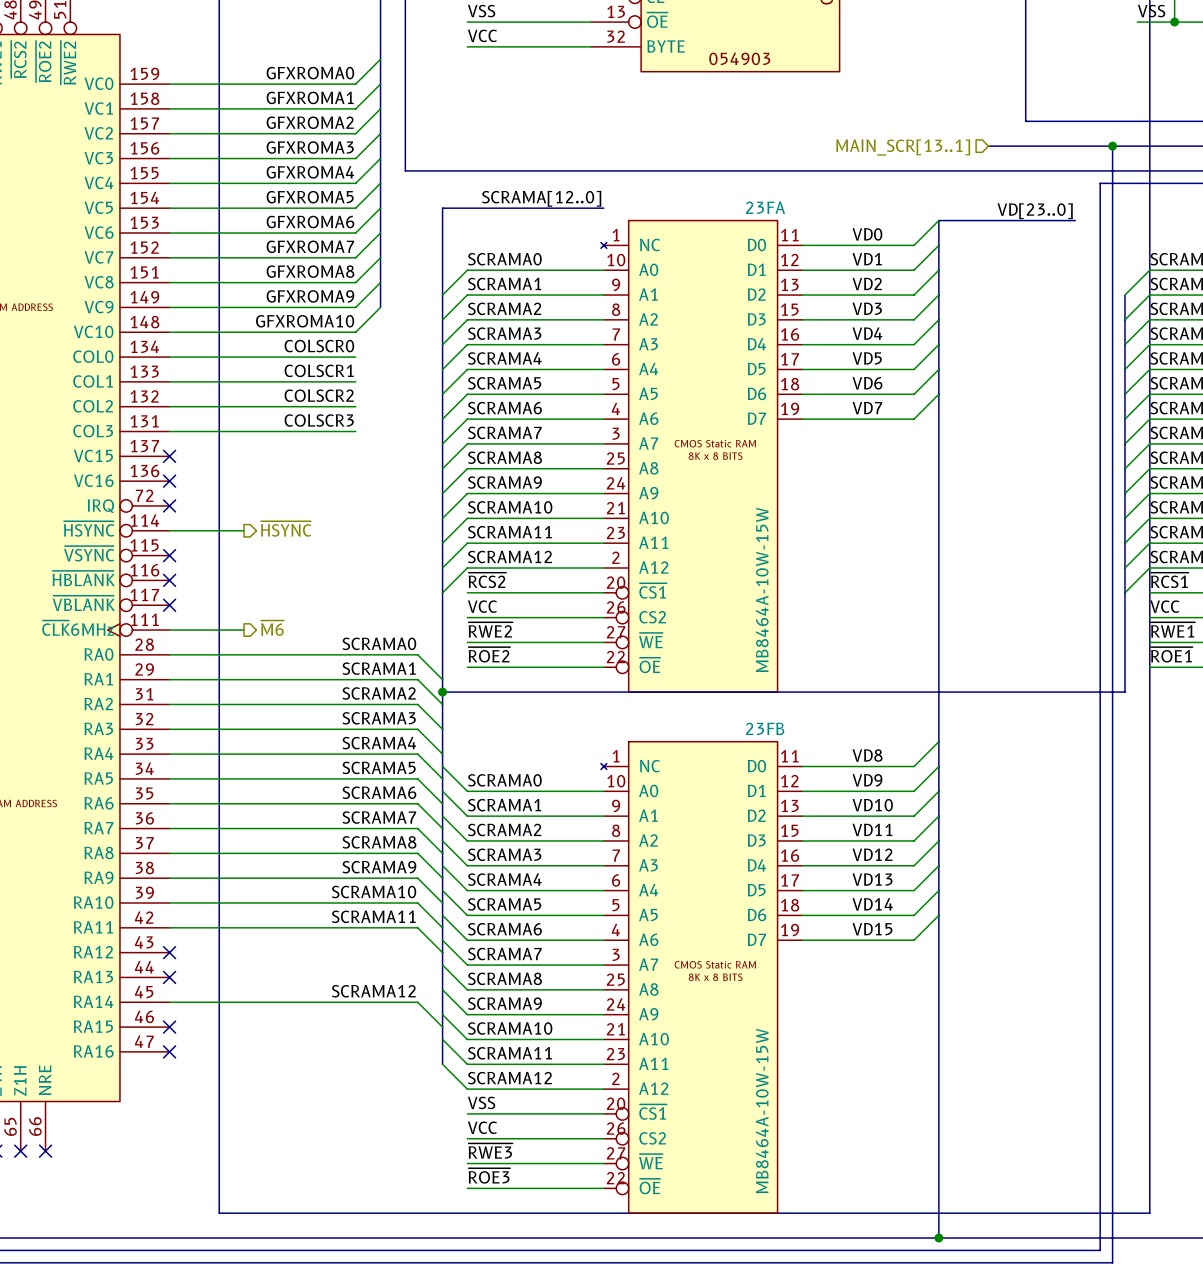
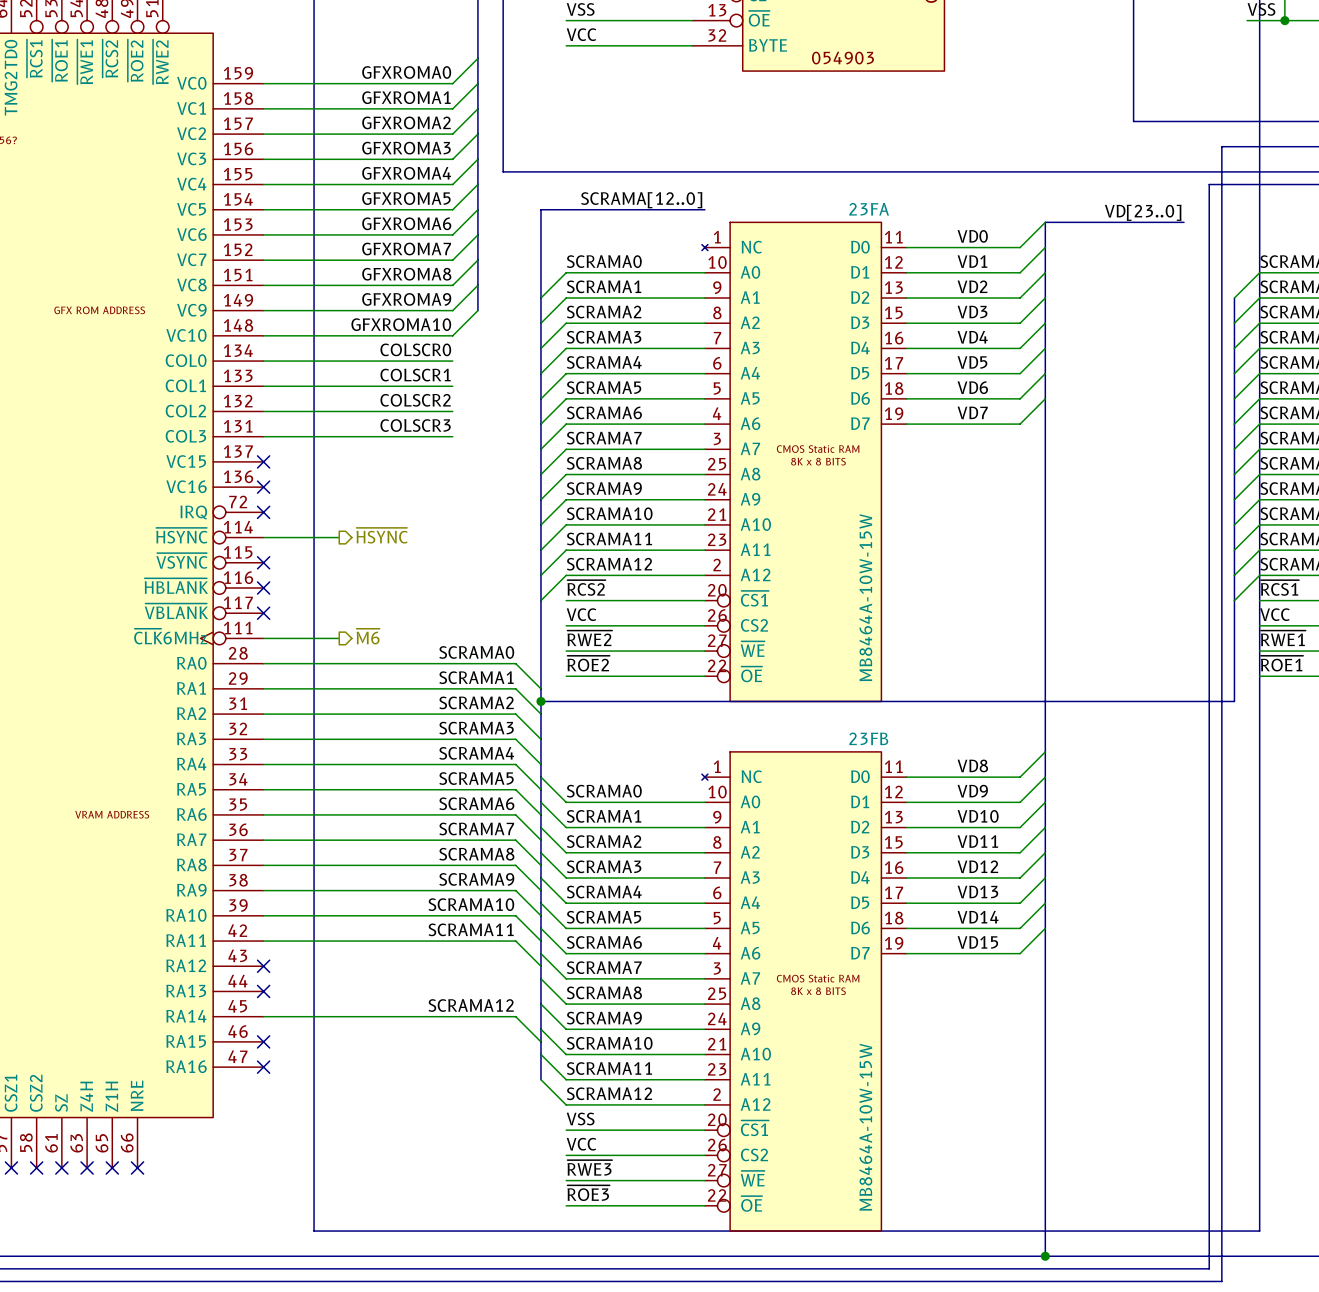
bus: (988, 146) (1112, 146) -> none
junction: (1112, 146) -> none
hierarchical label: MAIN_SCR[13..1] (903, 147) -> none

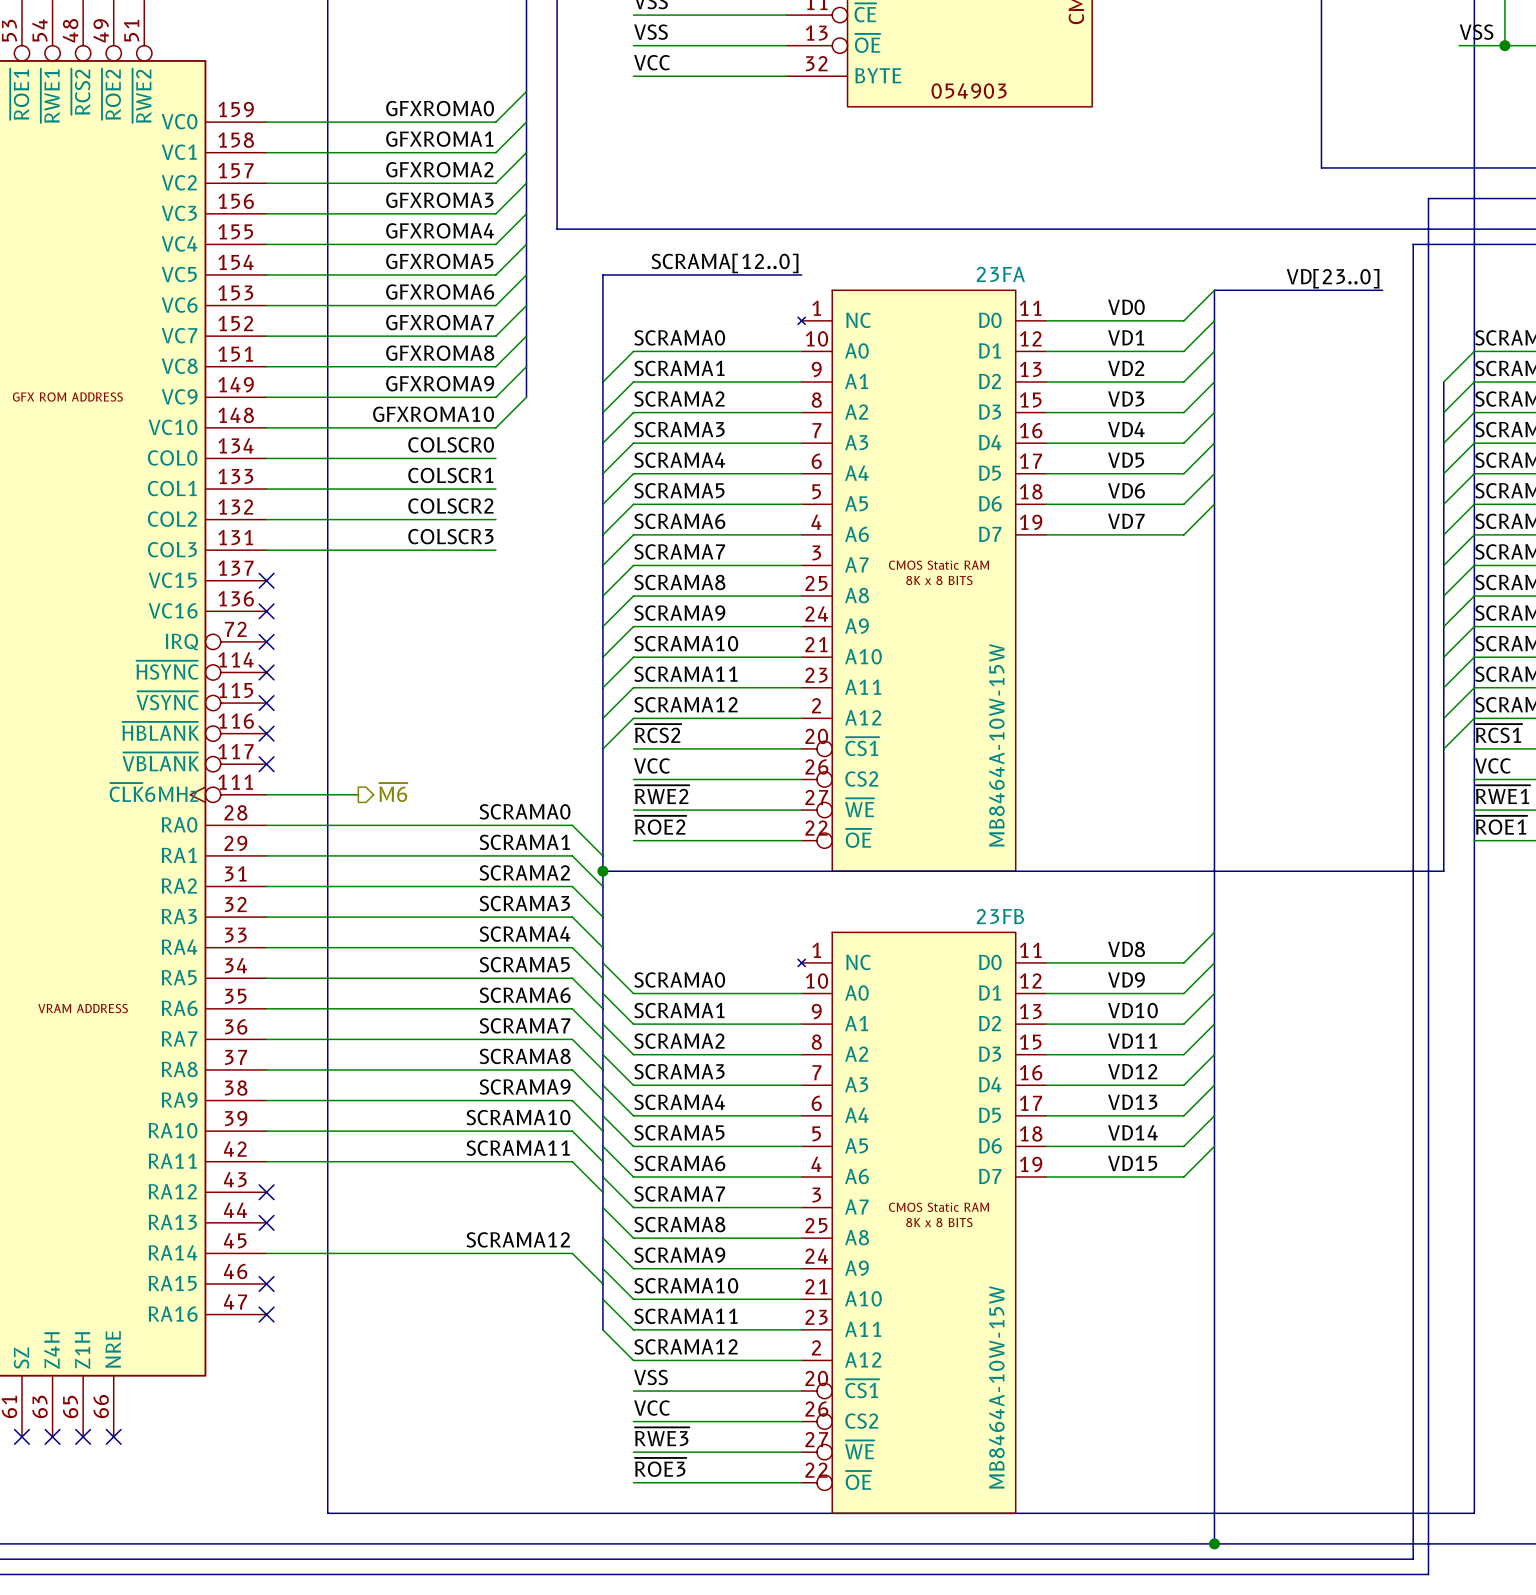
hierarchical label: ~{HSYNC} (382, 535) -> none
wire: (263, 537) (339, 537) -> none
no-connect mark: none -> (266, 672)

